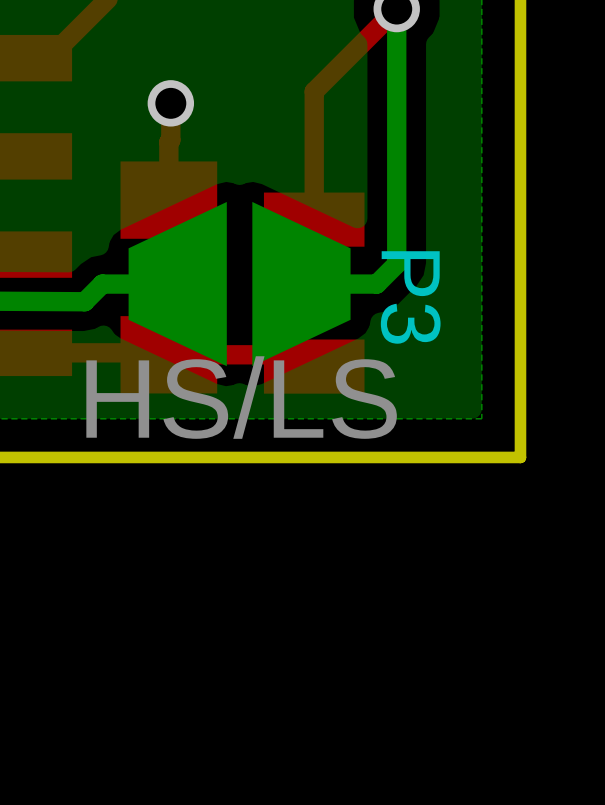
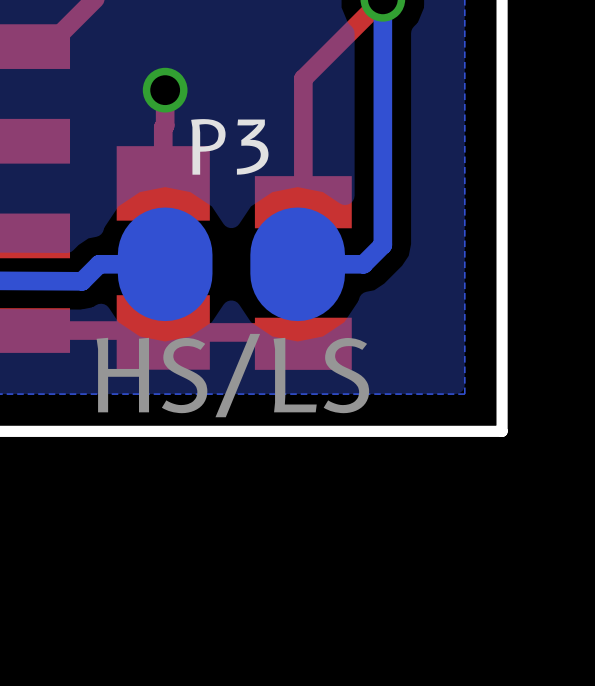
P3 footprint: [128, 201, 351, 367] -> [117, 207, 345, 322]
P3 name position: P3 (410, 297) -> P3 (229, 146)

